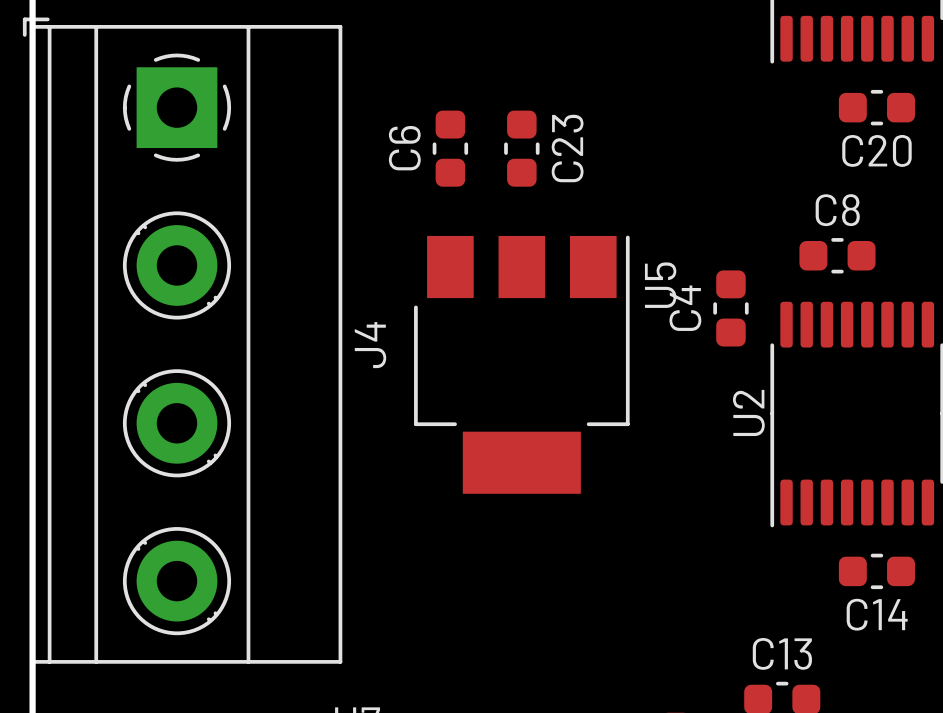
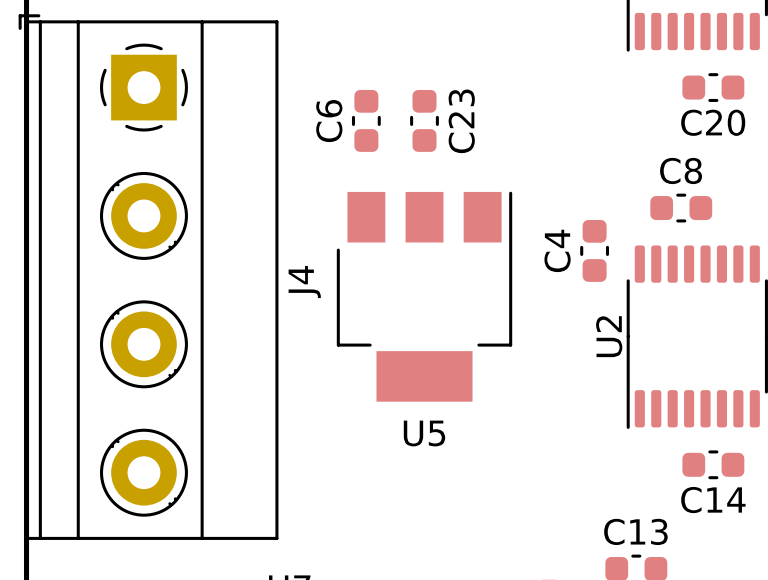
U5 name rotation: 0° (660, 285) -> 90° clockwise (424, 433)
U5 name position: U5 (660, 285) -> U5 (424, 433)

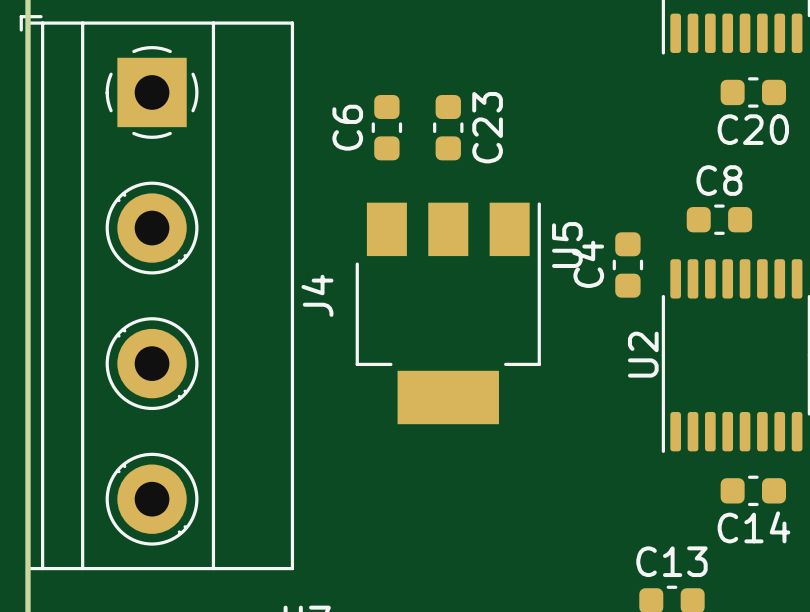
U5 name rotation: 0° (424, 433) -> 90° counterclockwise (567, 245)
U5 name position: U5 (424, 433) -> U5 (567, 245)

